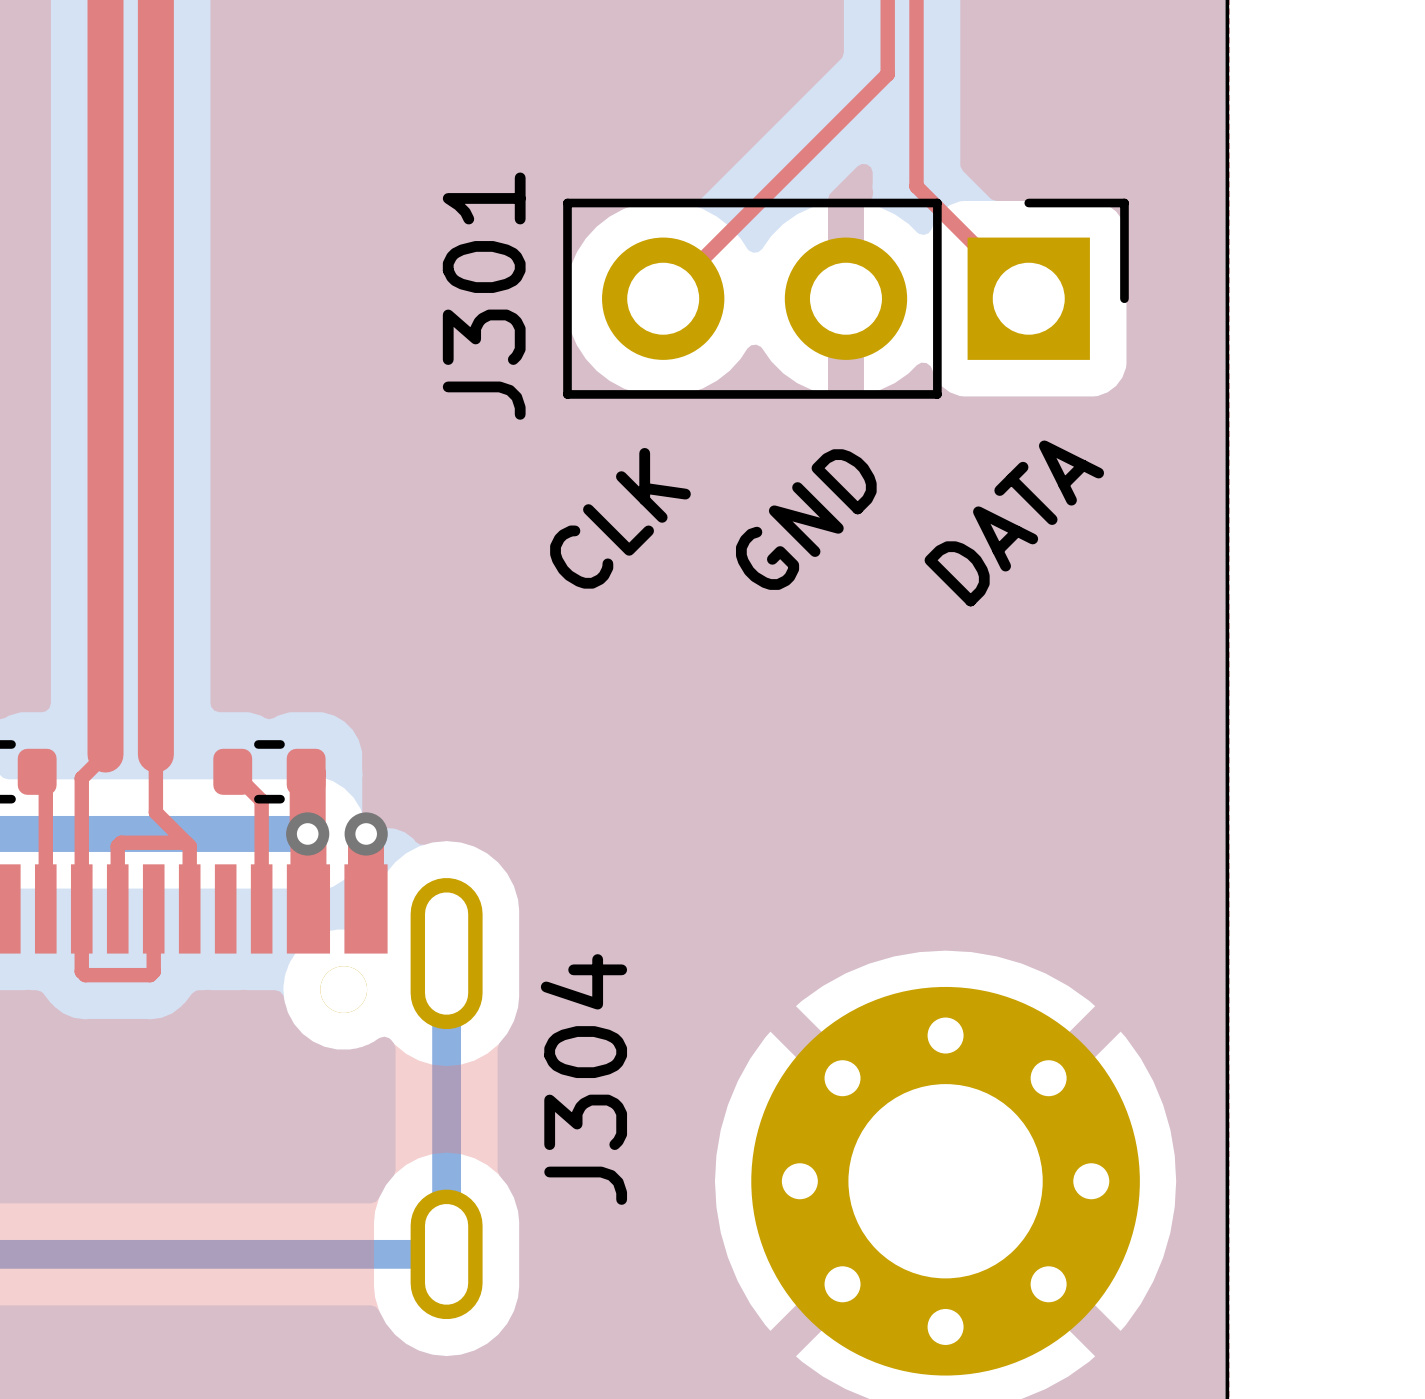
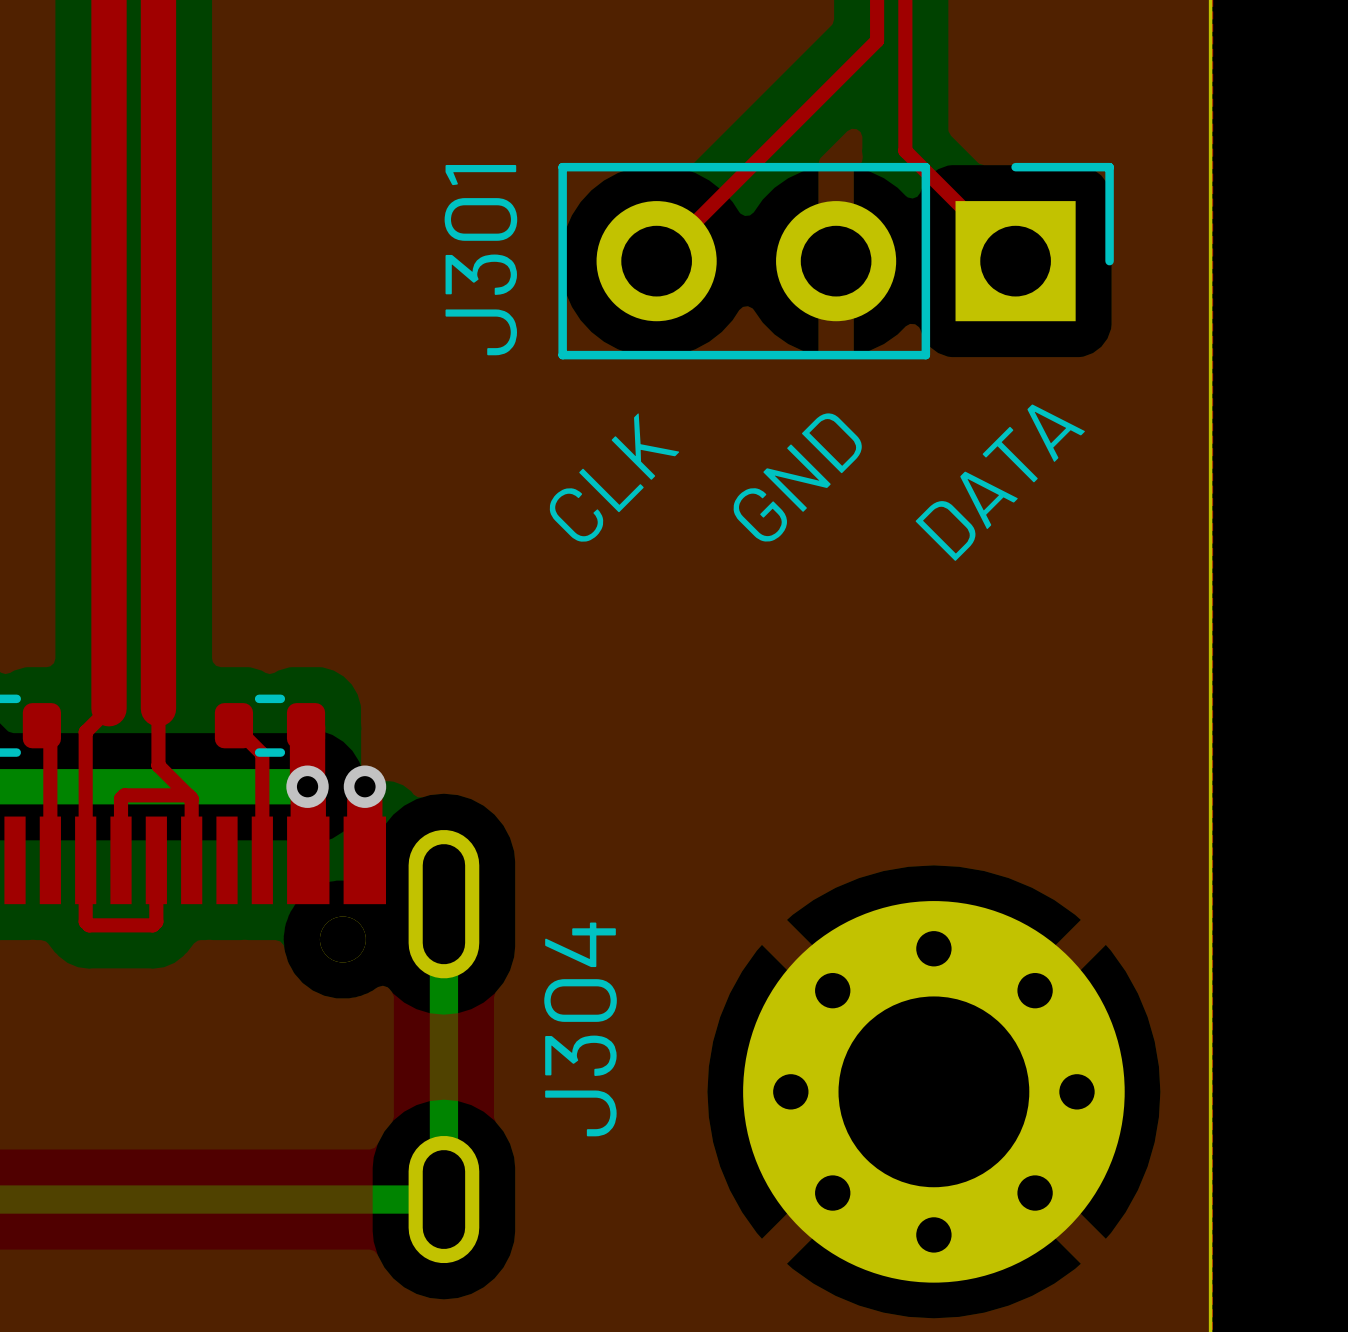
part position: (945, 1181) -> (933, 1091)

